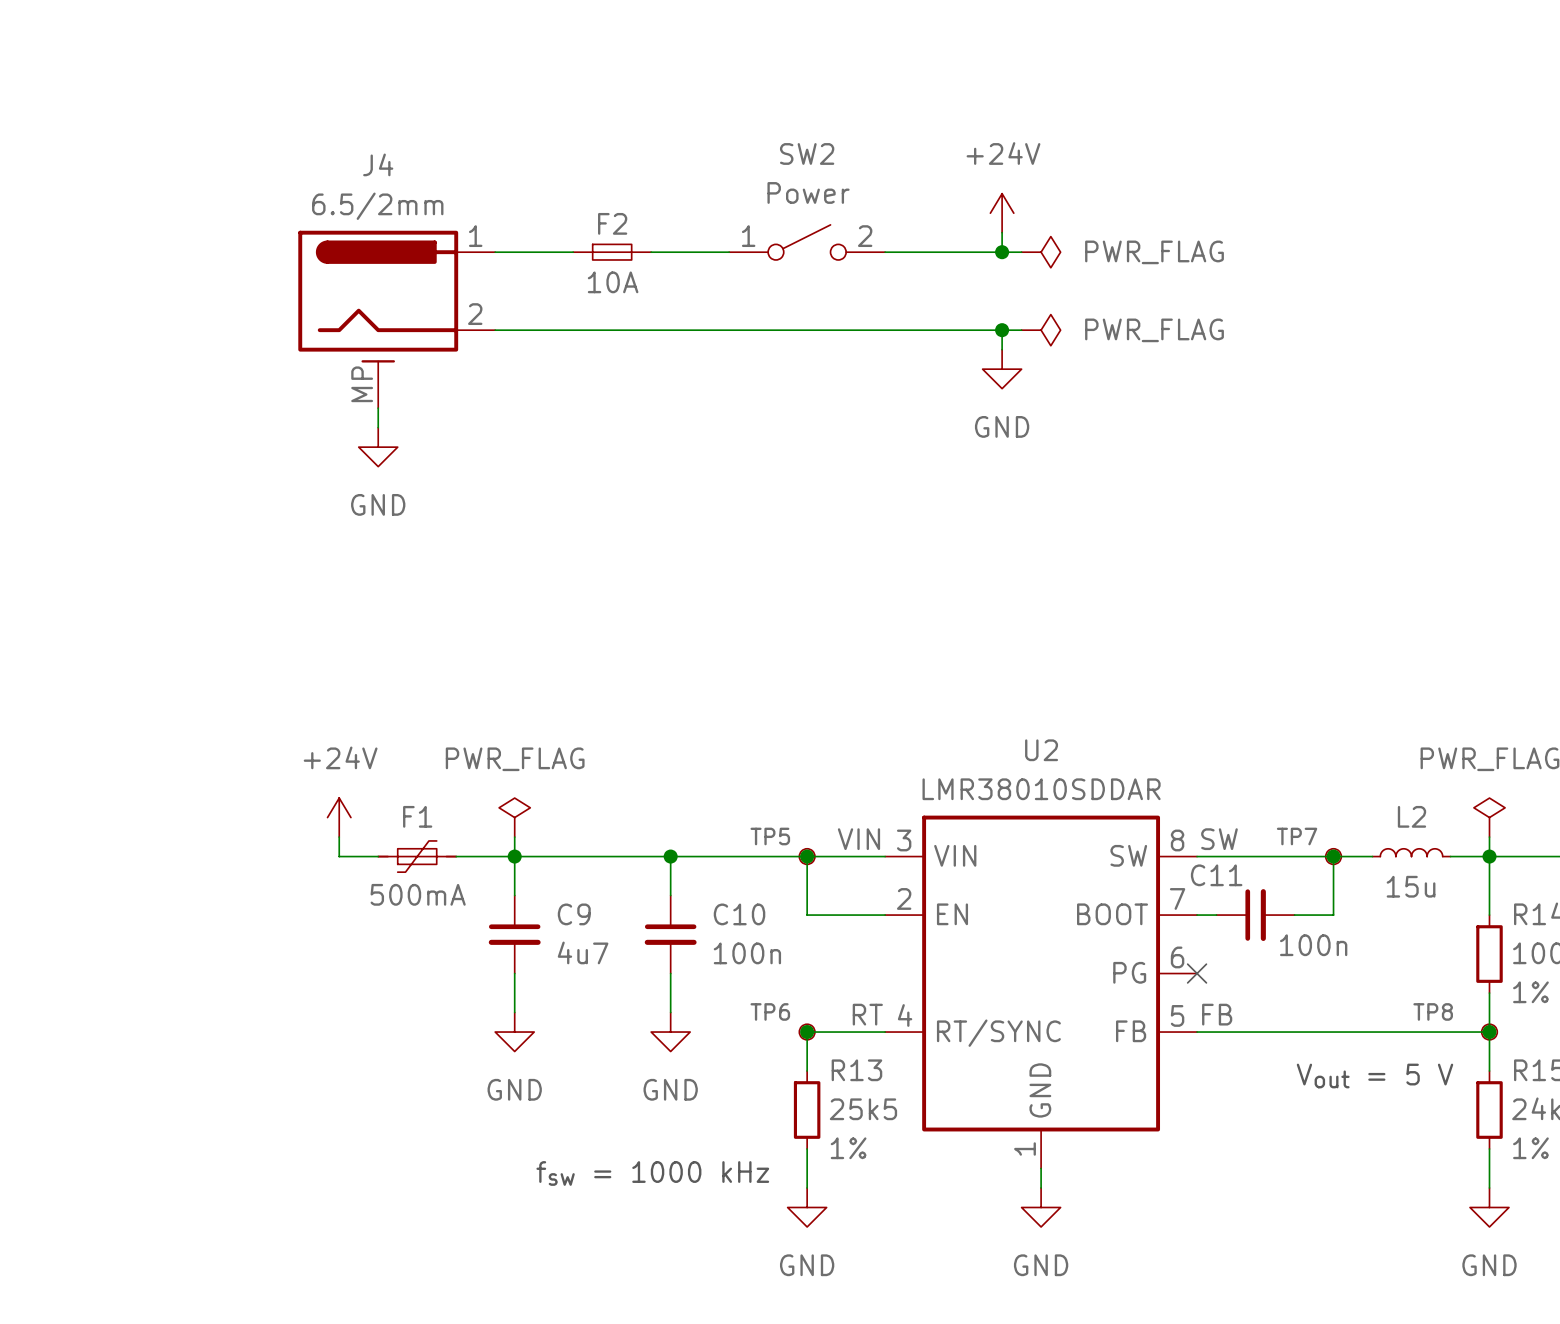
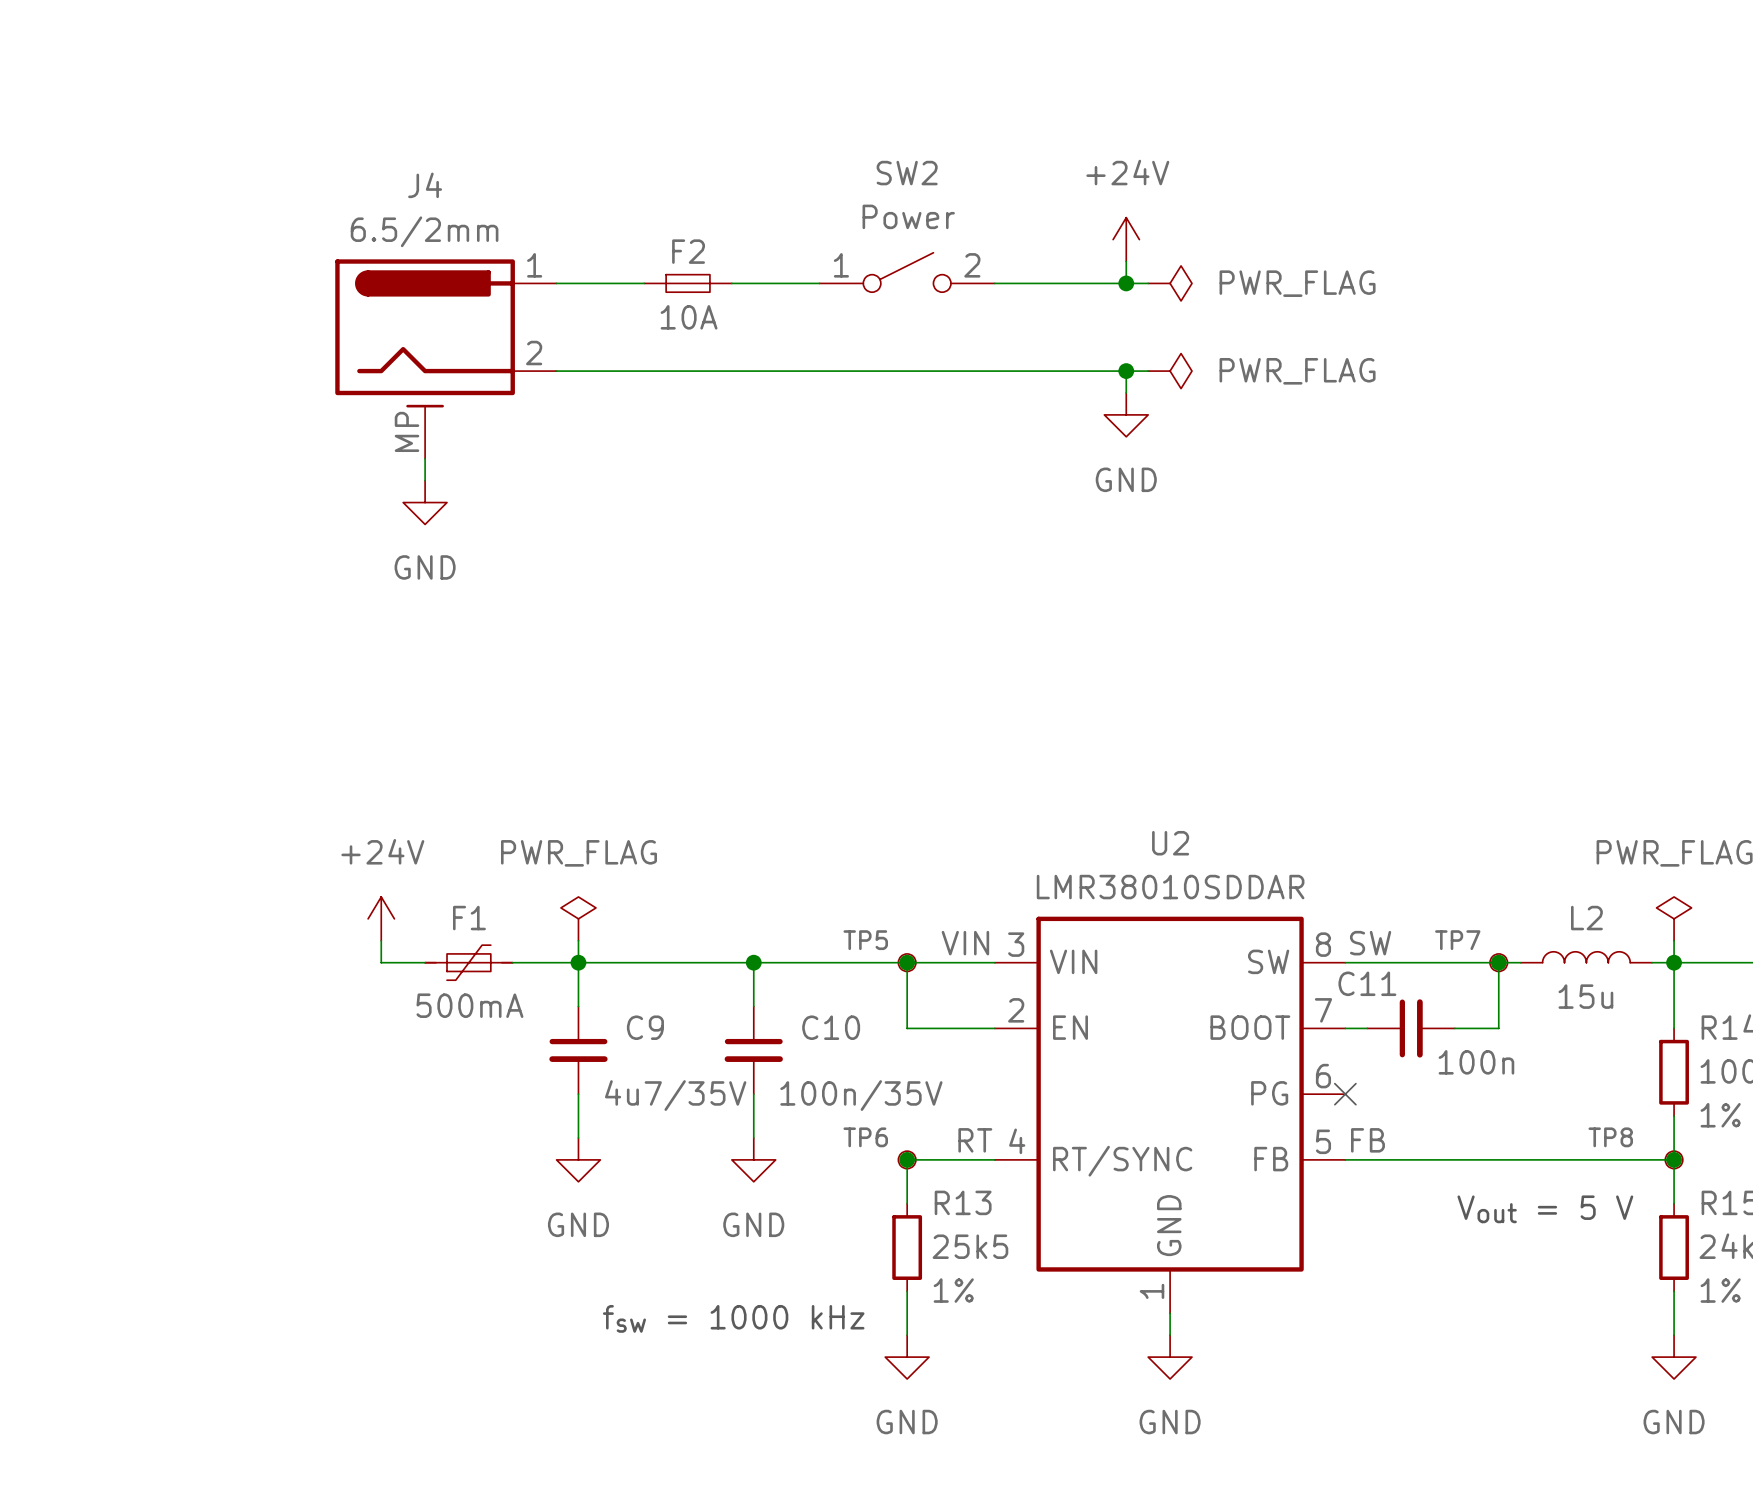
L2 symbol: [1372, 848, 1451, 857] -> [1520, 951, 1653, 963]
C9 value: 4u7 (583, 952) -> 4u7/35V (675, 1095)
C10 value: 100n (747, 953) -> 100n/35V (861, 1095)

